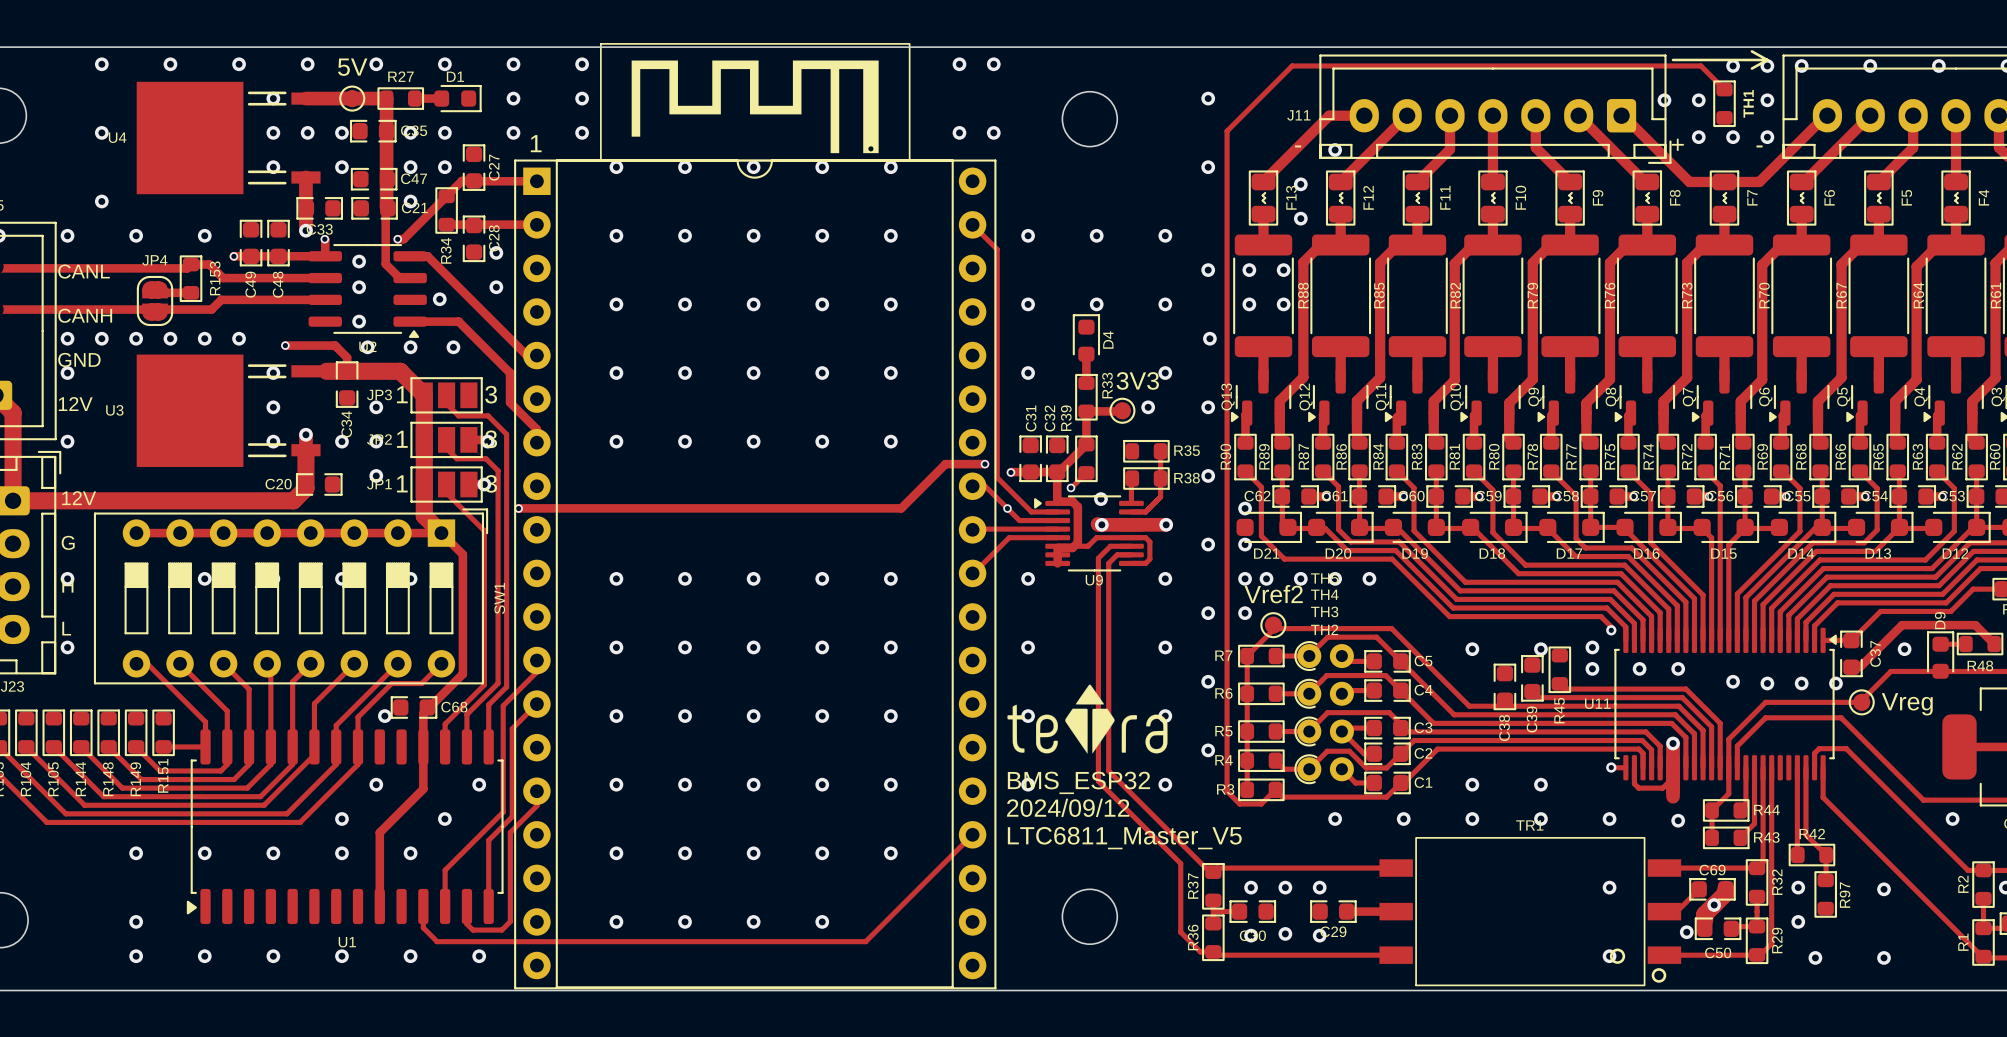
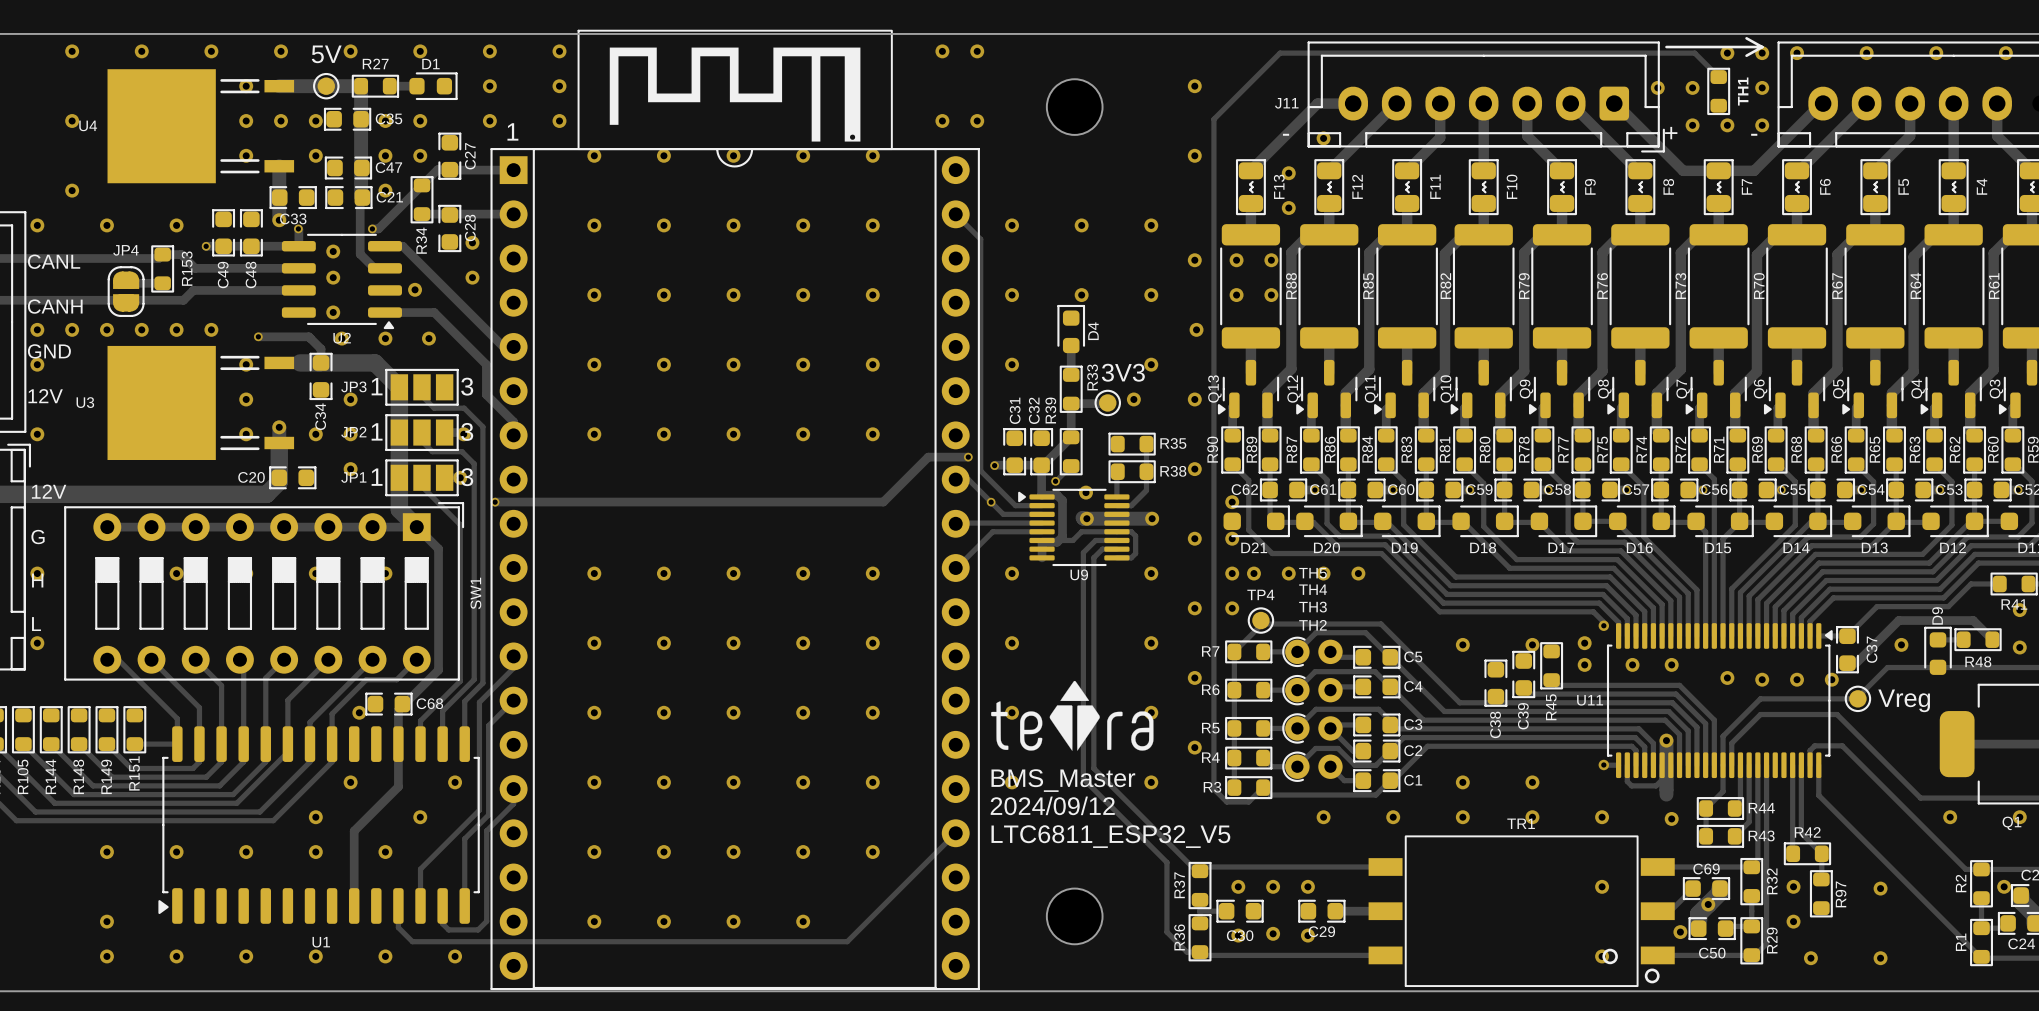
TP4 value: Vref2 (1273, 594) -> none
TP4 name: none -> TP4 (1260, 594)
text: BMS_ESP32 (1078, 782) -> BMS_Master (1063, 780)
text: LTC6811_Master_V5 (1124, 838) -> LTC6811_ESP32_V5 (1110, 836)

